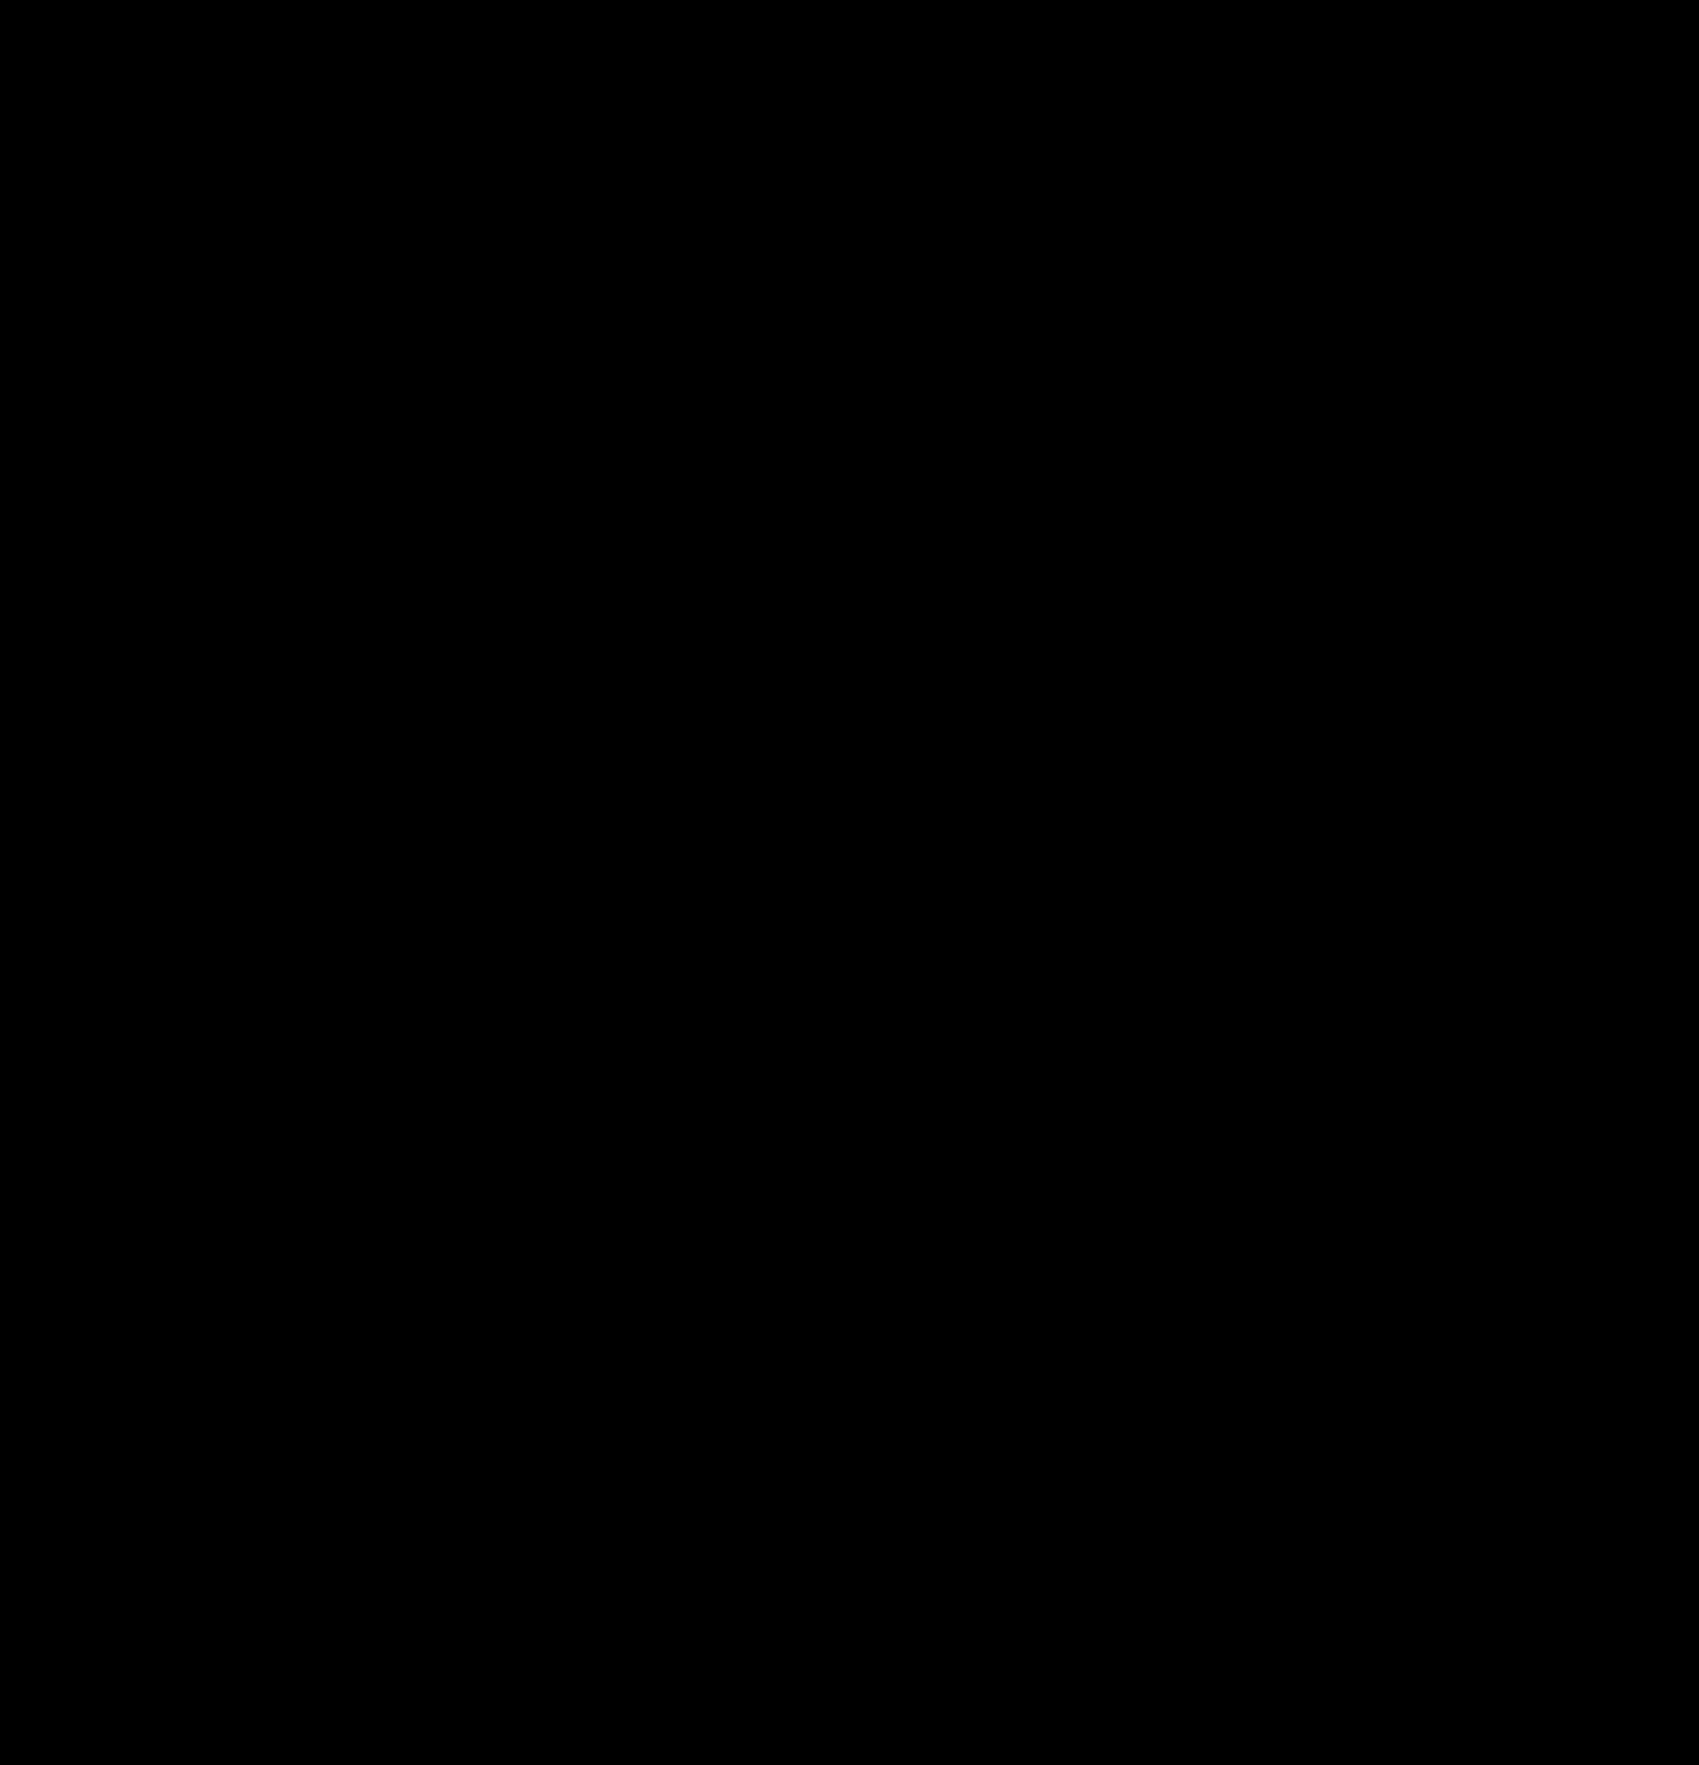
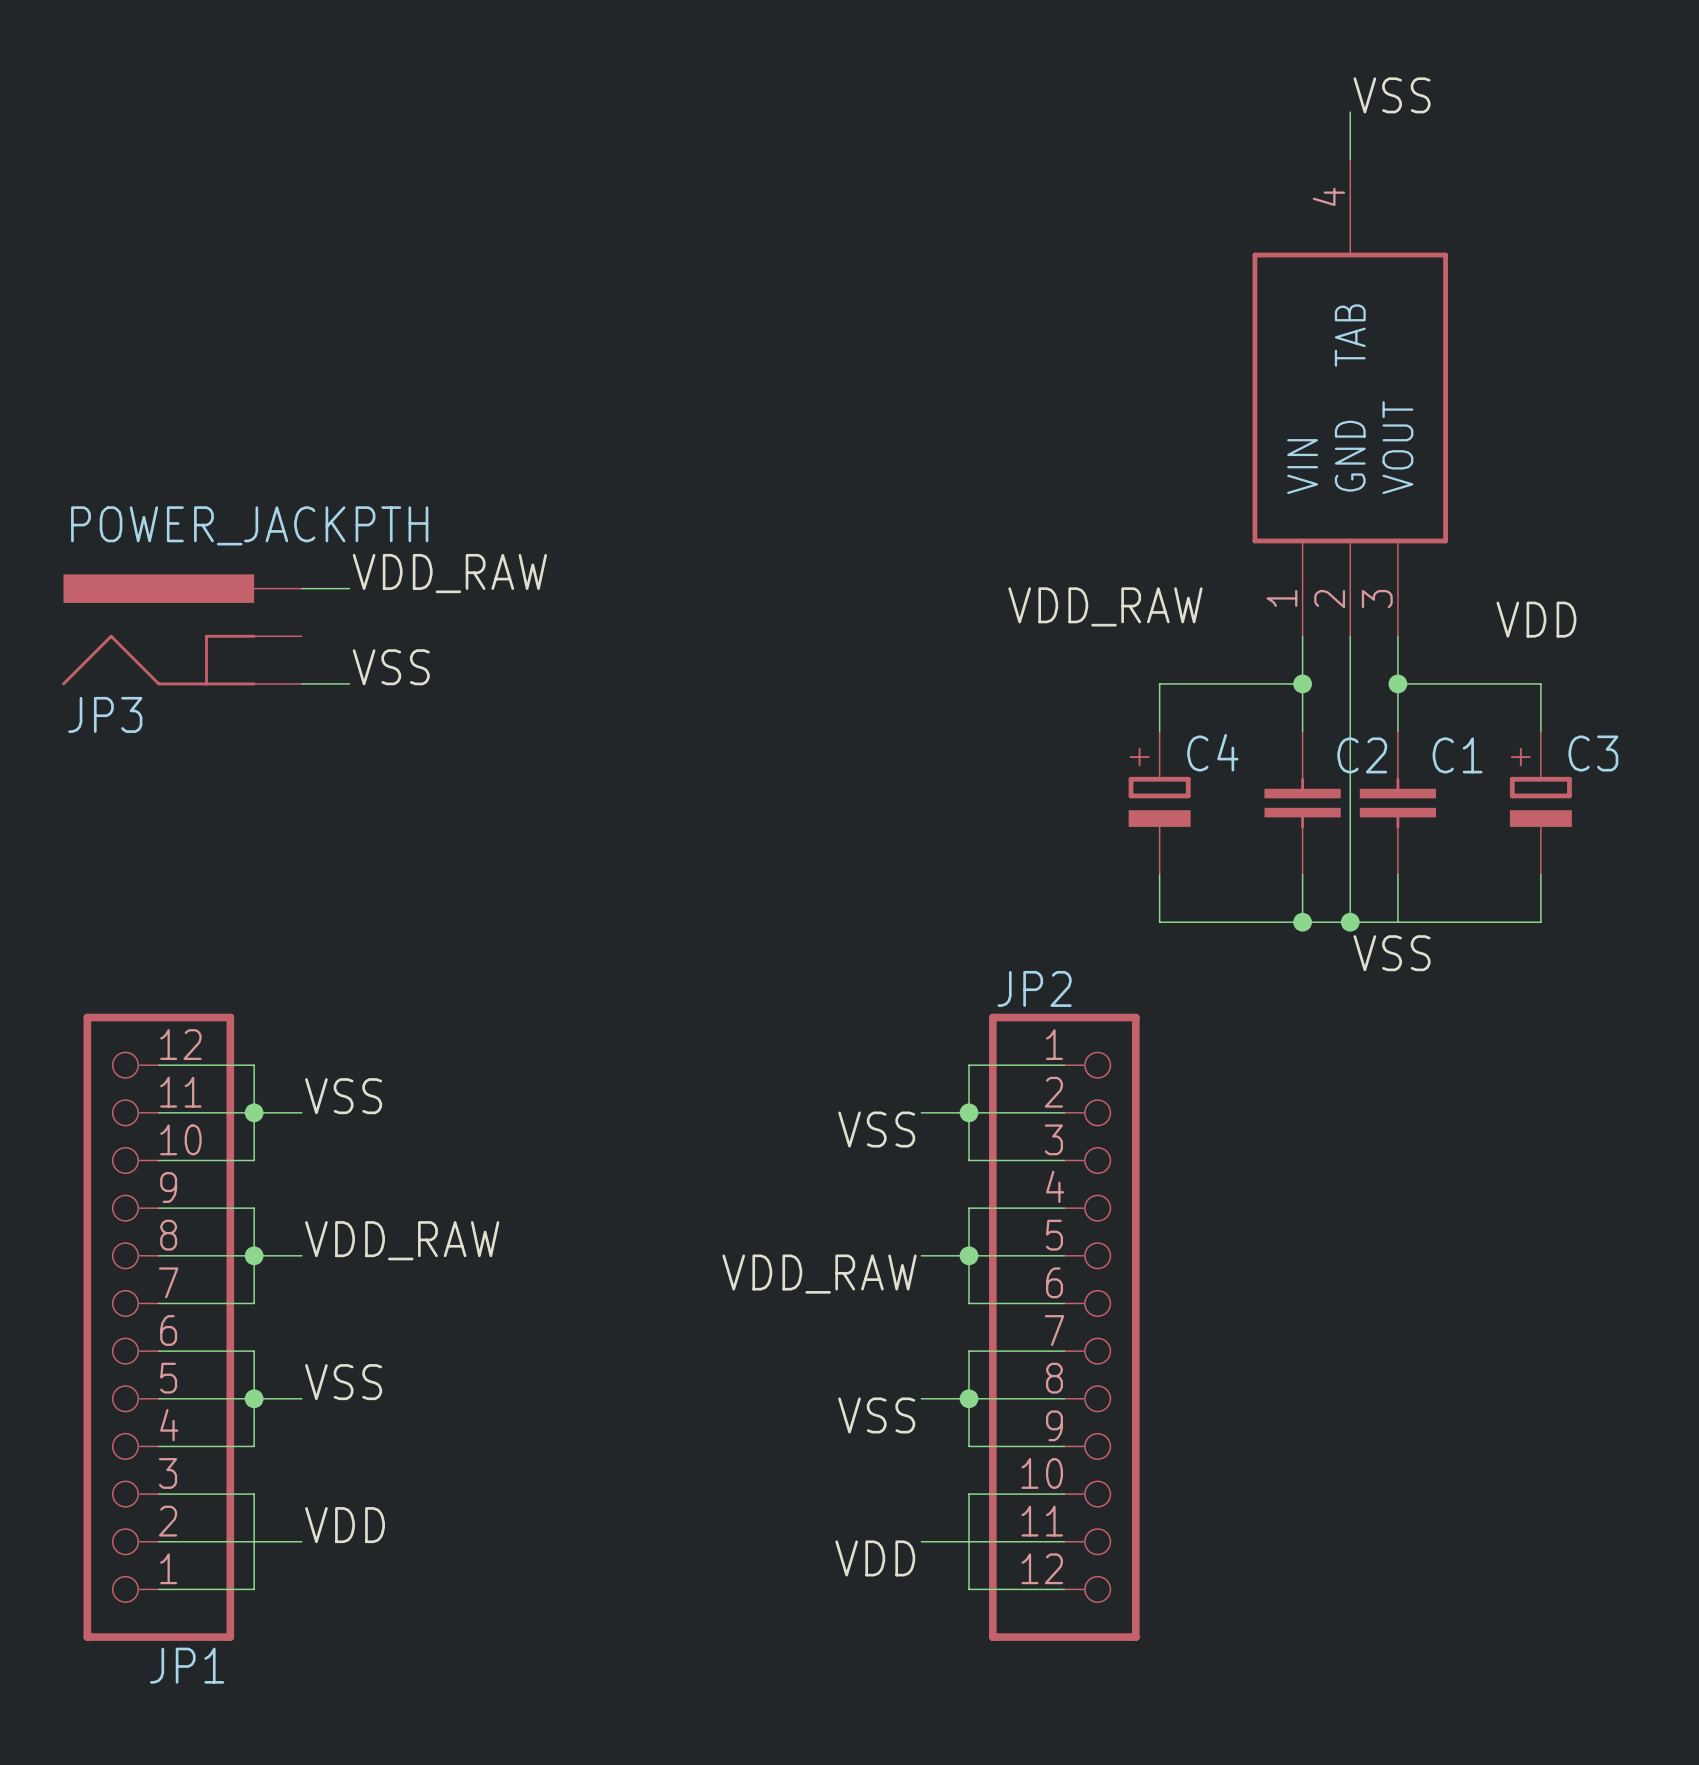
label: none -> VSS (1392, 95)
wire: none -> (1350, 112) (1350, 159)
part: none -> (1350, 397)
label: none -> VDD_RAW (449, 573)
wire: none -> (301, 588) (349, 588)
label: none -> VDD_RAW (1105, 606)
label: none -> VDD (1536, 619)
JP3: none -> POWER_JACKPTH (181, 629)
wire: none -> (1302, 636) (1302, 731)
wire: none -> (1350, 636) (1350, 922)
wire: none -> (1397, 636) (1397, 731)
label: none -> VSS (391, 667)
wire: none -> (301, 683) (349, 683)
wire: none -> (1302, 683) (1159, 683) (1159, 731)
junction: none -> (1302, 683)
wire: none -> (1397, 683) (1540, 683) (1540, 731)
junction: none -> (1397, 683)
C4: none -> (1159, 803)
C2: none -> (1302, 803)
C1: none -> (1397, 803)
C3: none -> (1540, 803)
wire: none -> (1159, 874) (1159, 922) (1540, 922) (1540, 874)
wire: none -> (1302, 874) (1302, 922)
wire: none -> (1397, 874) (1397, 922)
junction: none -> (1302, 922)
junction: none -> (1350, 922)
label: none -> VSS (1392, 953)
wire: none -> (158, 1065) (254, 1065) (254, 1160) (158, 1160)
wire: none -> (1064, 1065) (969, 1065) (969, 1160) (1064, 1160)
label: none -> VSS (343, 1096)
wire: none -> (158, 1112) (301, 1112)
junction: none -> (254, 1112)
wire: none -> (921, 1112) (1064, 1112)
junction: none -> (969, 1112)
label: none -> VSS (876, 1129)
wire: none -> (158, 1208) (254, 1208) (254, 1303) (158, 1303)
wire: none -> (1064, 1208) (969, 1208) (969, 1303) (1064, 1303)
label: none -> VDD_RAW (402, 1240)
wire: none -> (158, 1255) (301, 1255)
junction: none -> (254, 1255)
wire: none -> (921, 1255) (1064, 1255)
junction: none -> (969, 1255)
label: none -> VDD_RAW (819, 1274)
JP1: none -> (158, 1327)
JP2: none -> (1064, 1327)
wire: none -> (158, 1351) (254, 1351) (254, 1446) (158, 1446)
wire: none -> (1064, 1351) (969, 1351) (969, 1446) (1064, 1446)
label: none -> VSS (343, 1382)
wire: none -> (158, 1398) (301, 1398)
junction: none -> (254, 1398)
wire: none -> (921, 1398) (1064, 1398)
junction: none -> (969, 1398)
label: none -> VSS (876, 1415)
wire: none -> (158, 1494) (254, 1494) (254, 1589) (158, 1589)
wire: none -> (1064, 1494) (969, 1494) (969, 1589) (1064, 1589)
label: none -> VDD (345, 1525)
wire: none -> (158, 1541) (301, 1541)
wire: none -> (921, 1541) (1064, 1541)
label: none -> VDD (875, 1558)

